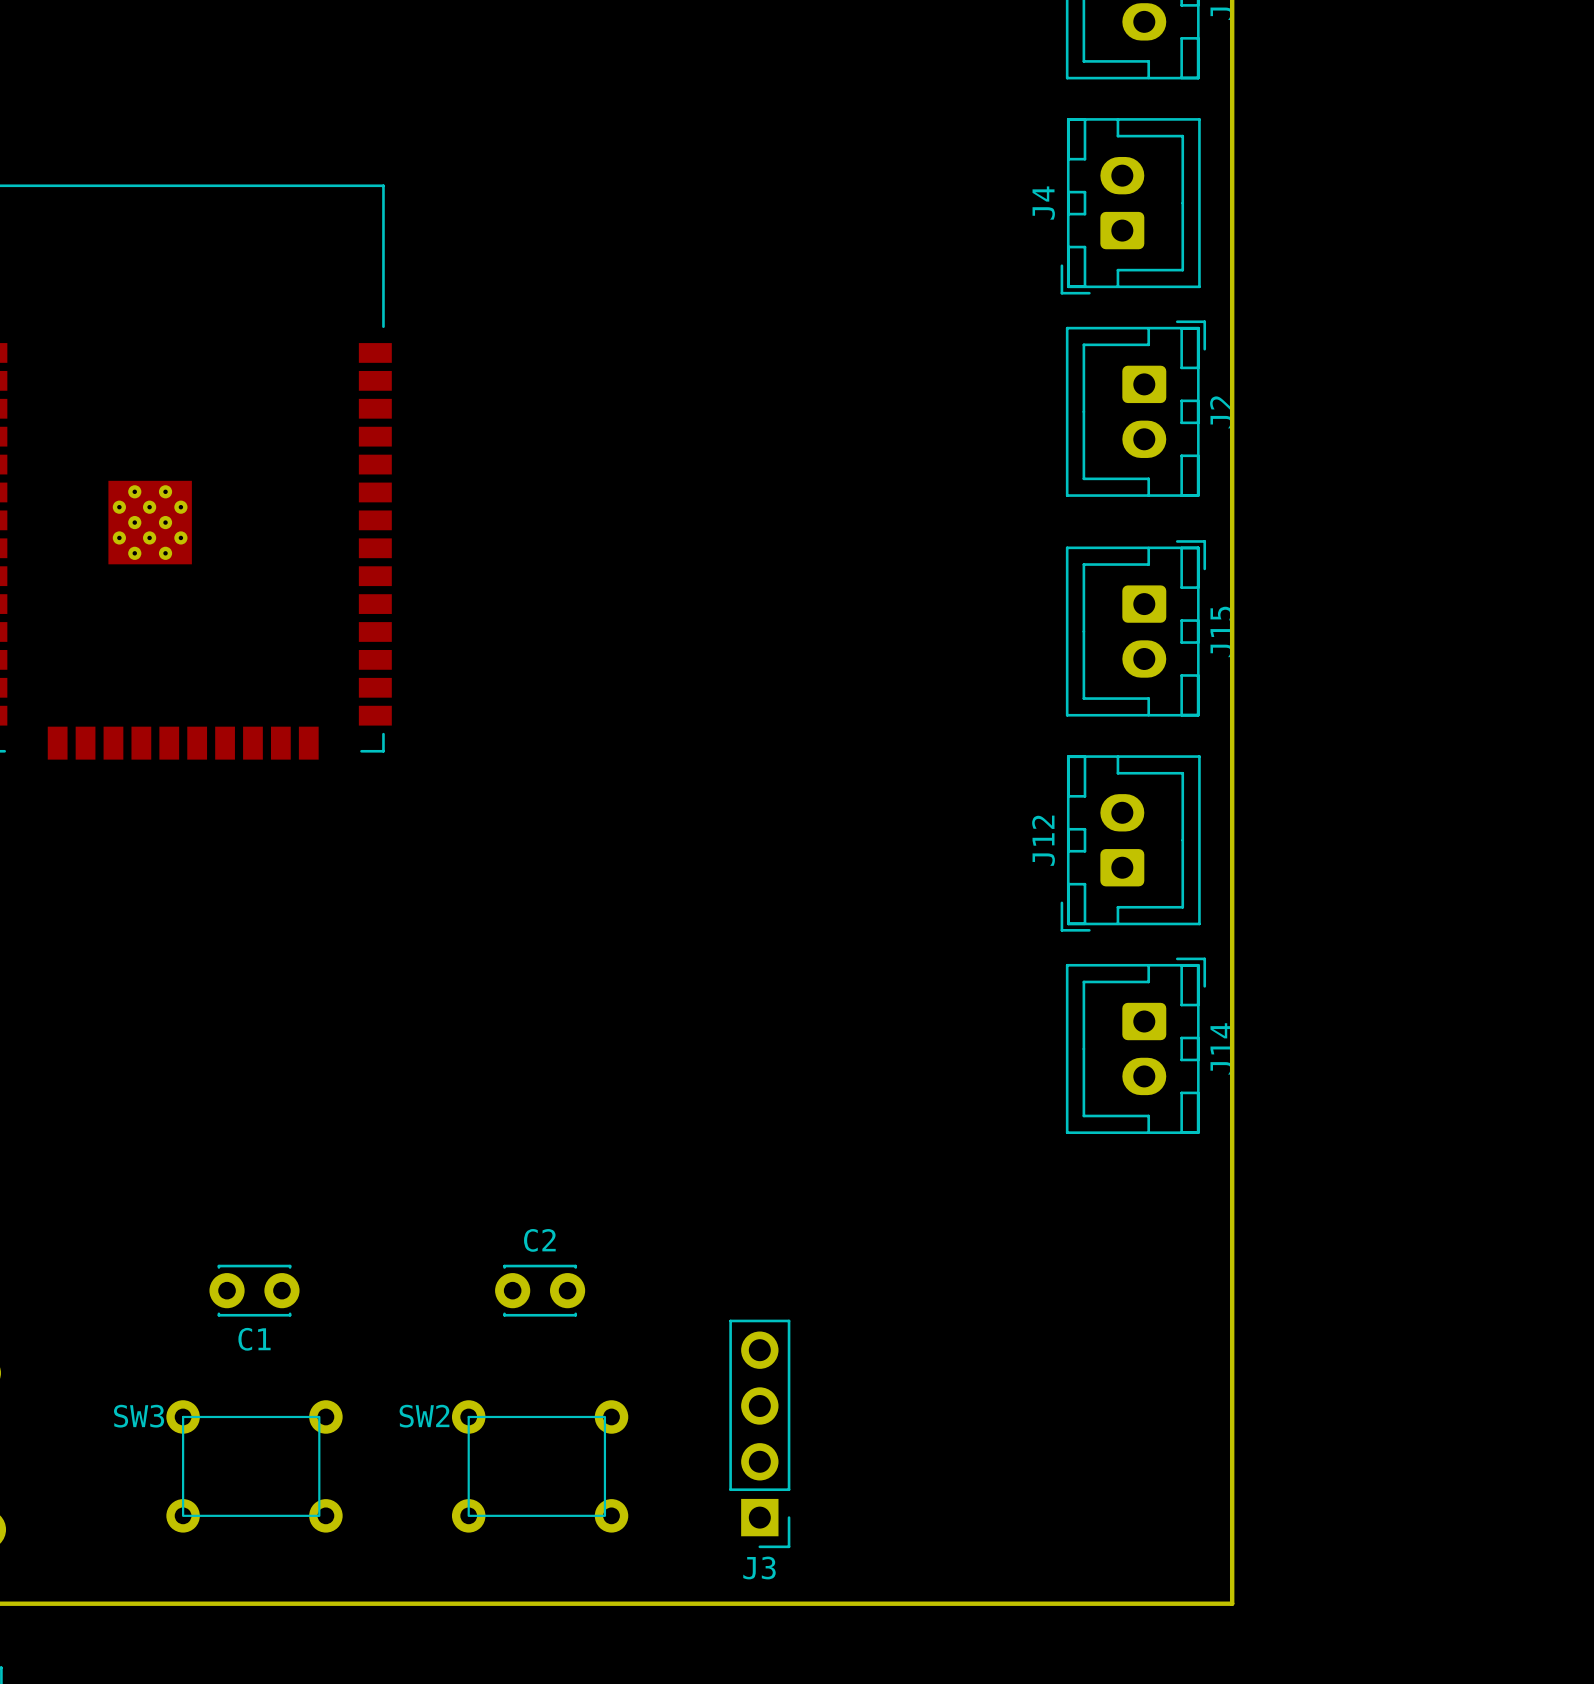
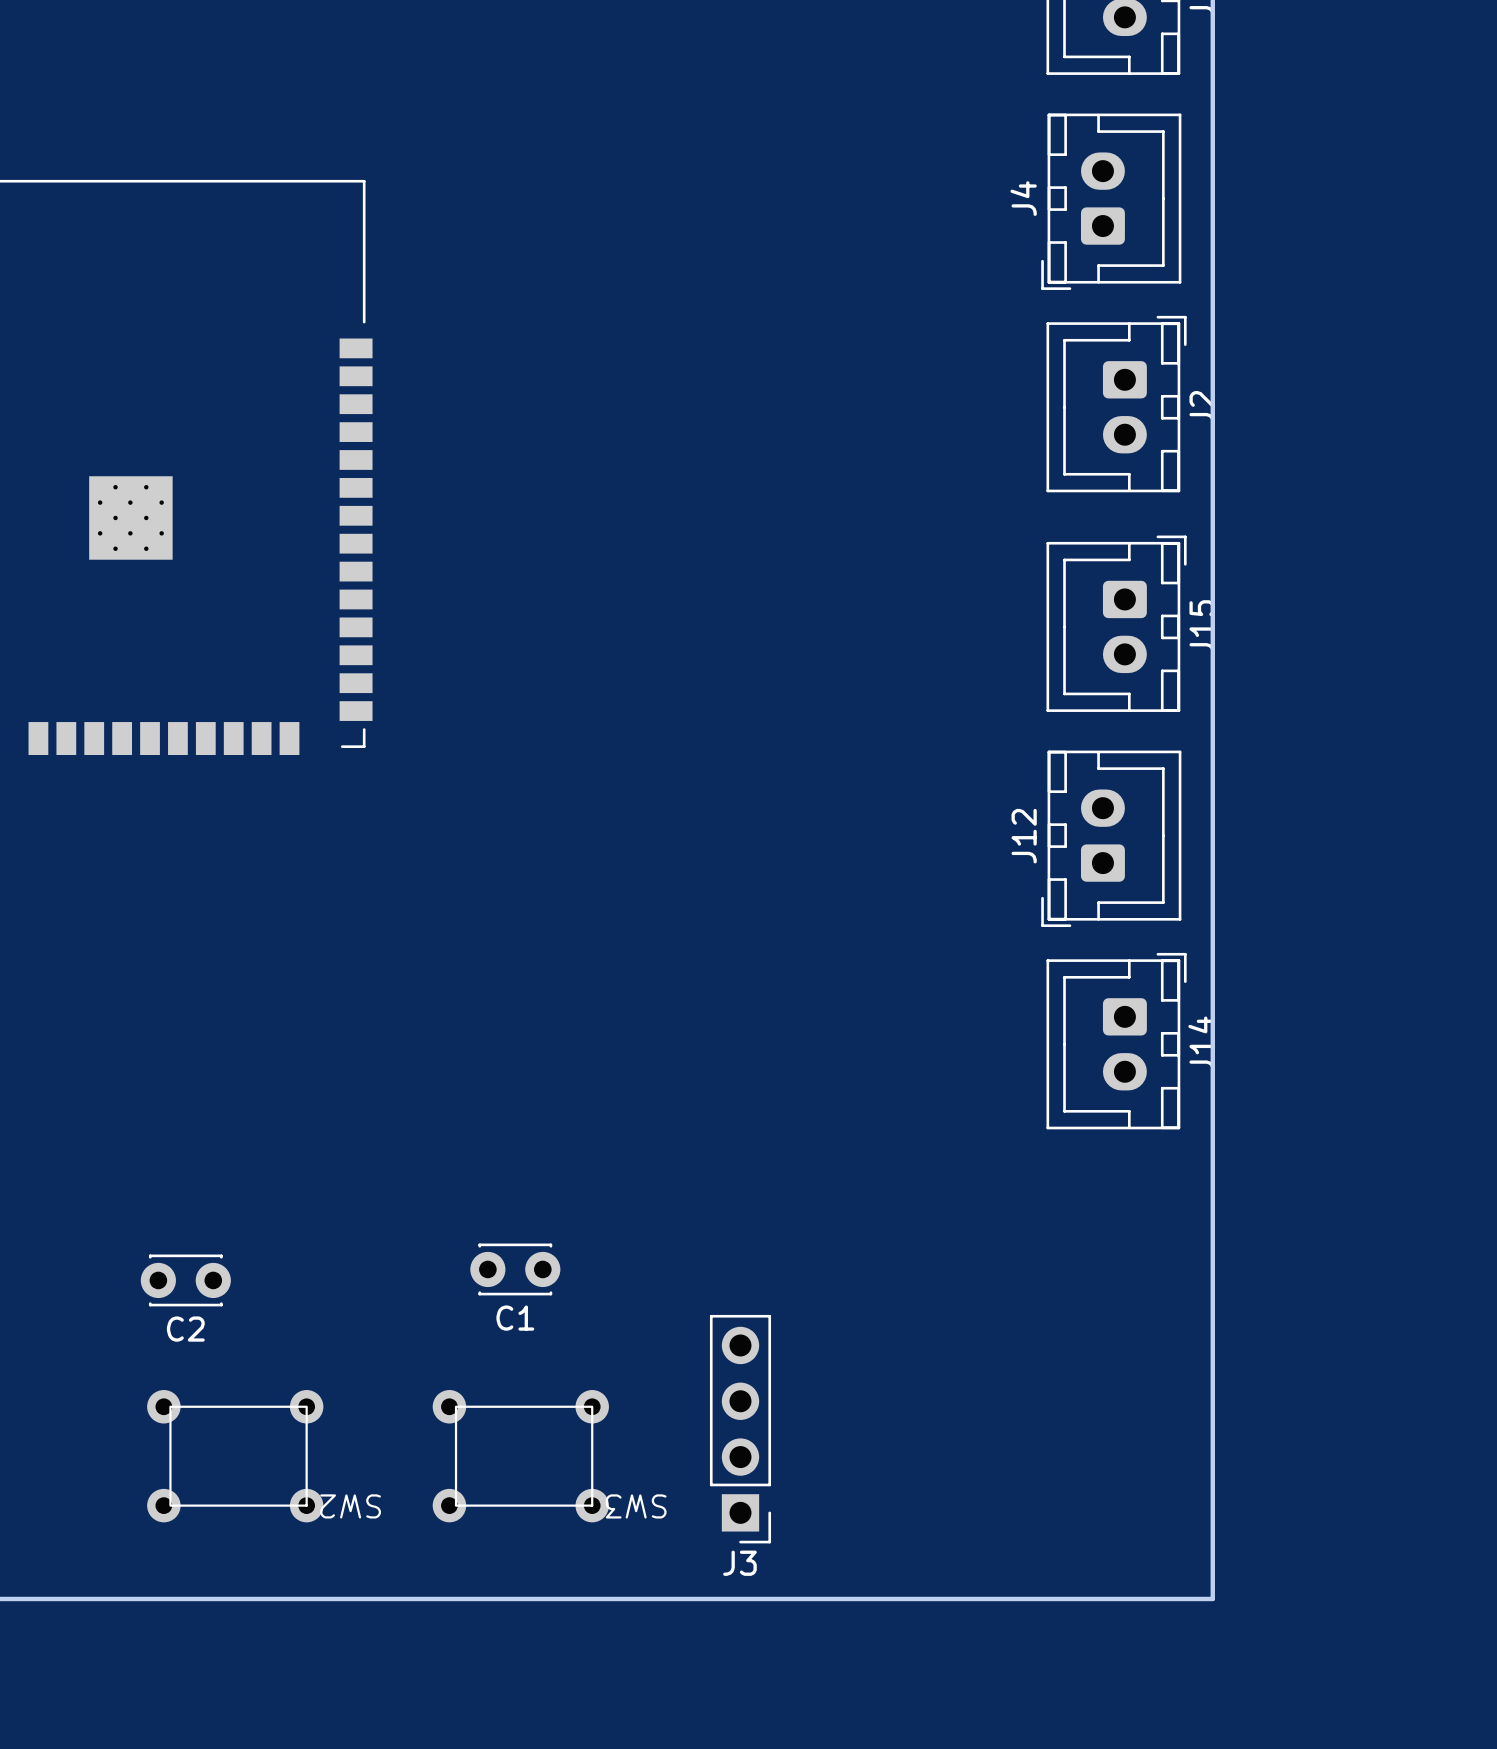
C2 name position: C2 (539, 1240) -> C2 (185, 1329)
C1 position: (254, 1290) -> (515, 1269)
C2 position: (540, 1290) -> (185, 1280)
SW3 rotation: 0° (254, 1466) -> 180° (520, 1456)
SW3 position: (254, 1466) -> (520, 1456)
SW2 rotation: 0° (540, 1466) -> 180° (235, 1456)
SW2 position: (540, 1466) -> (235, 1456)

